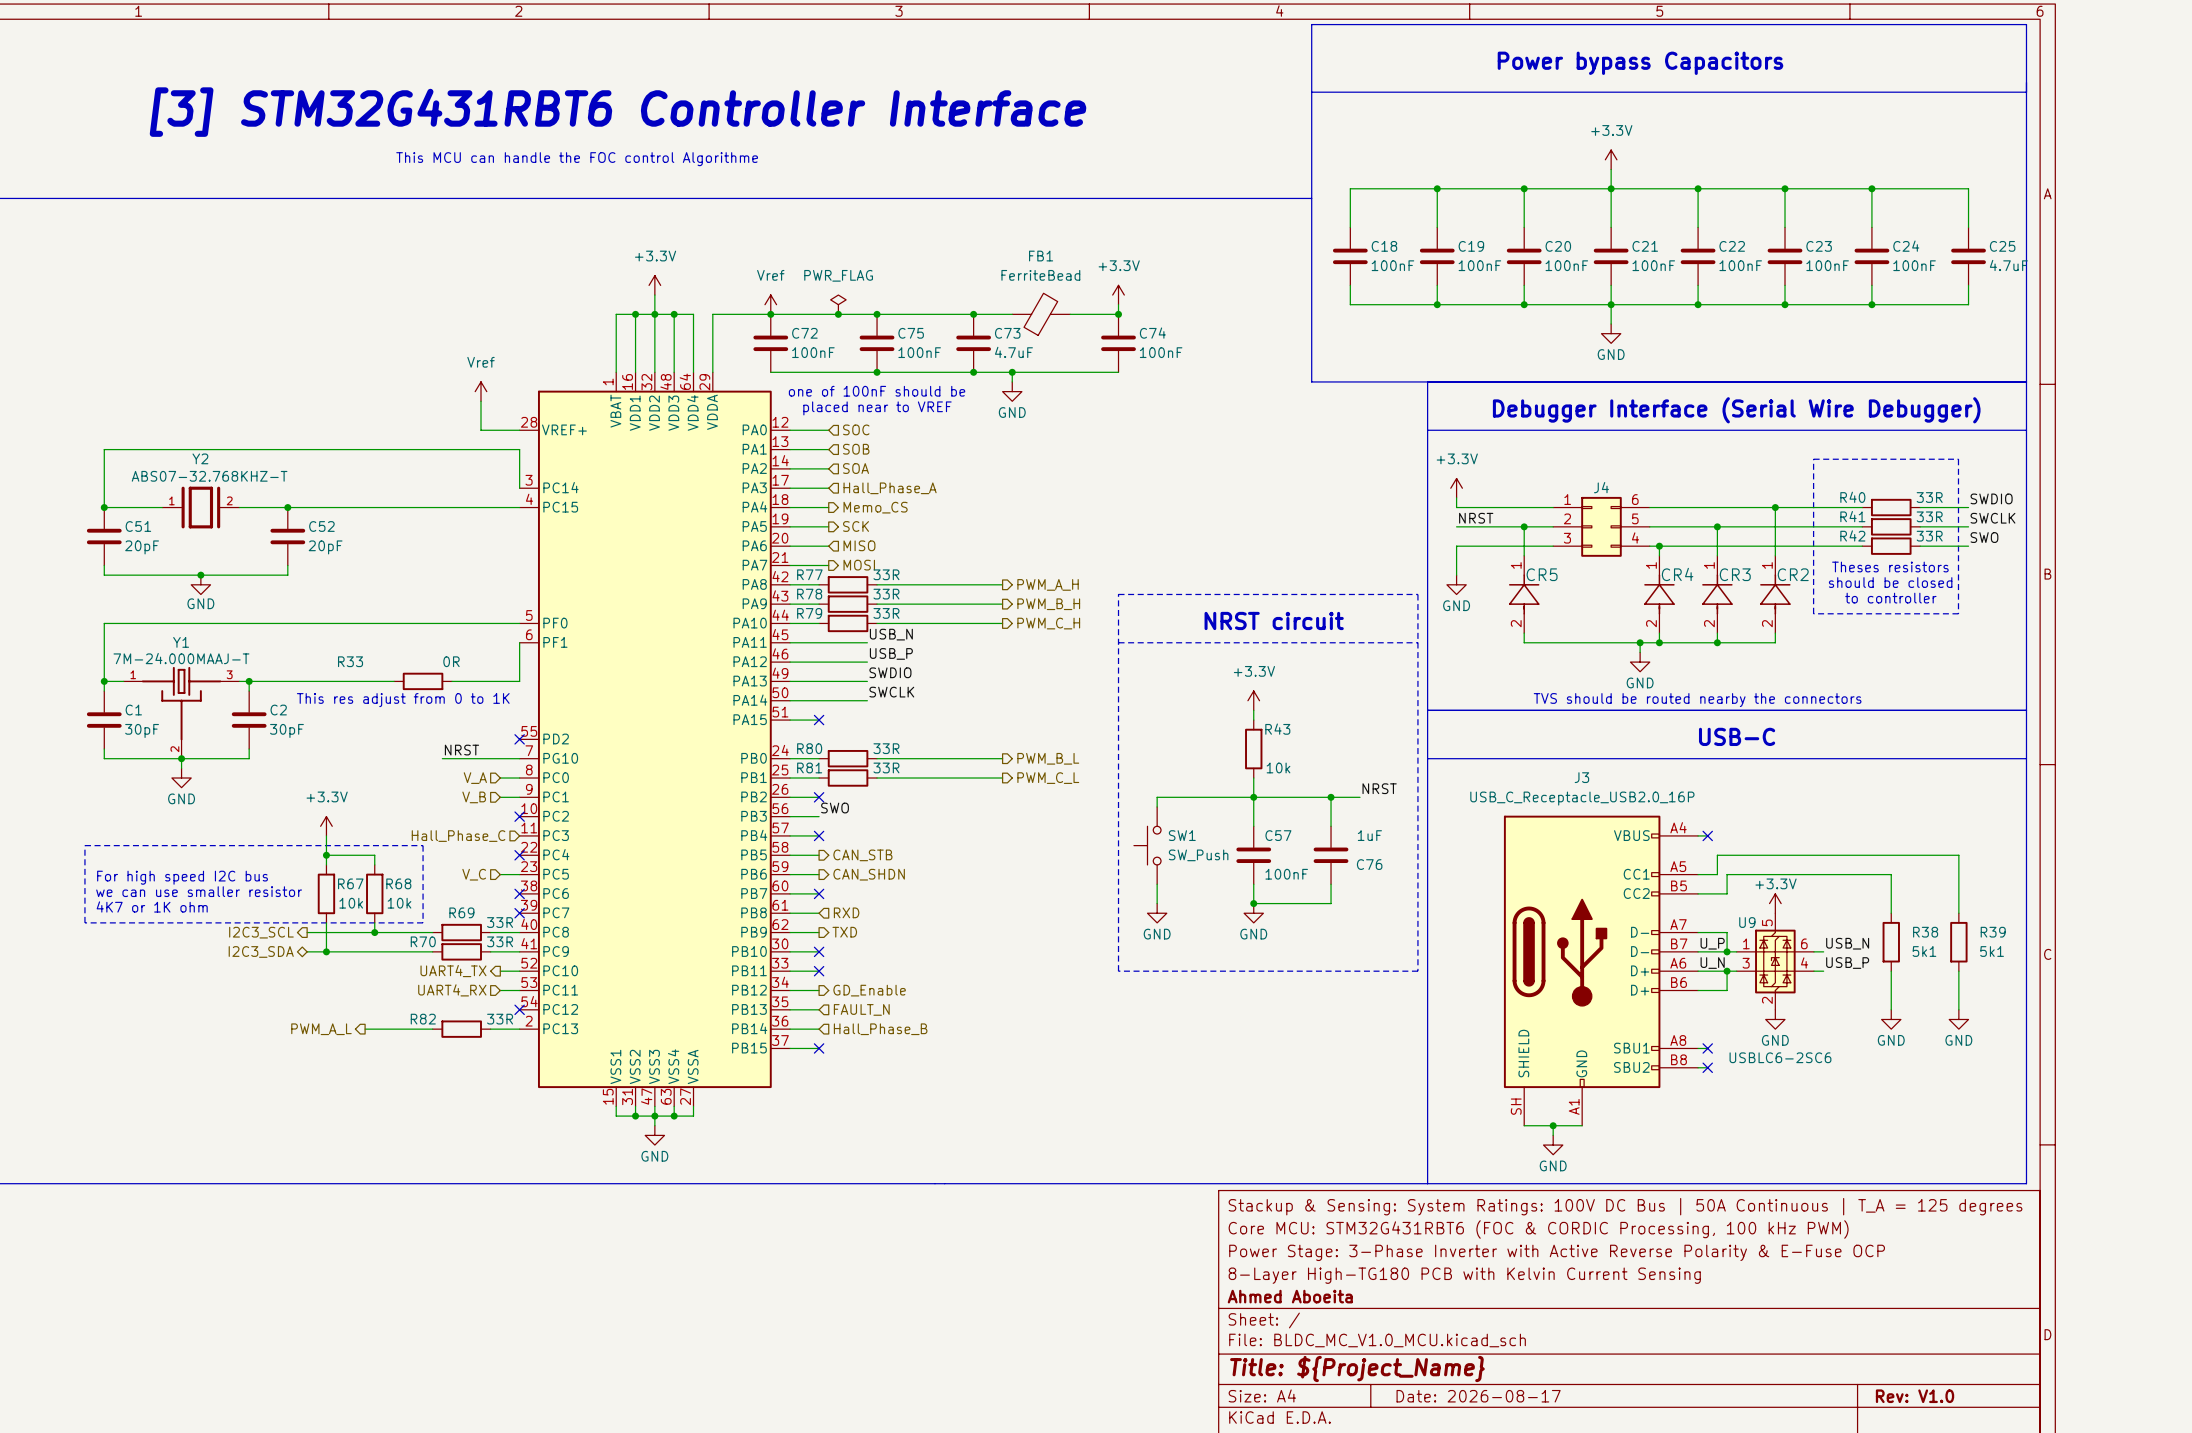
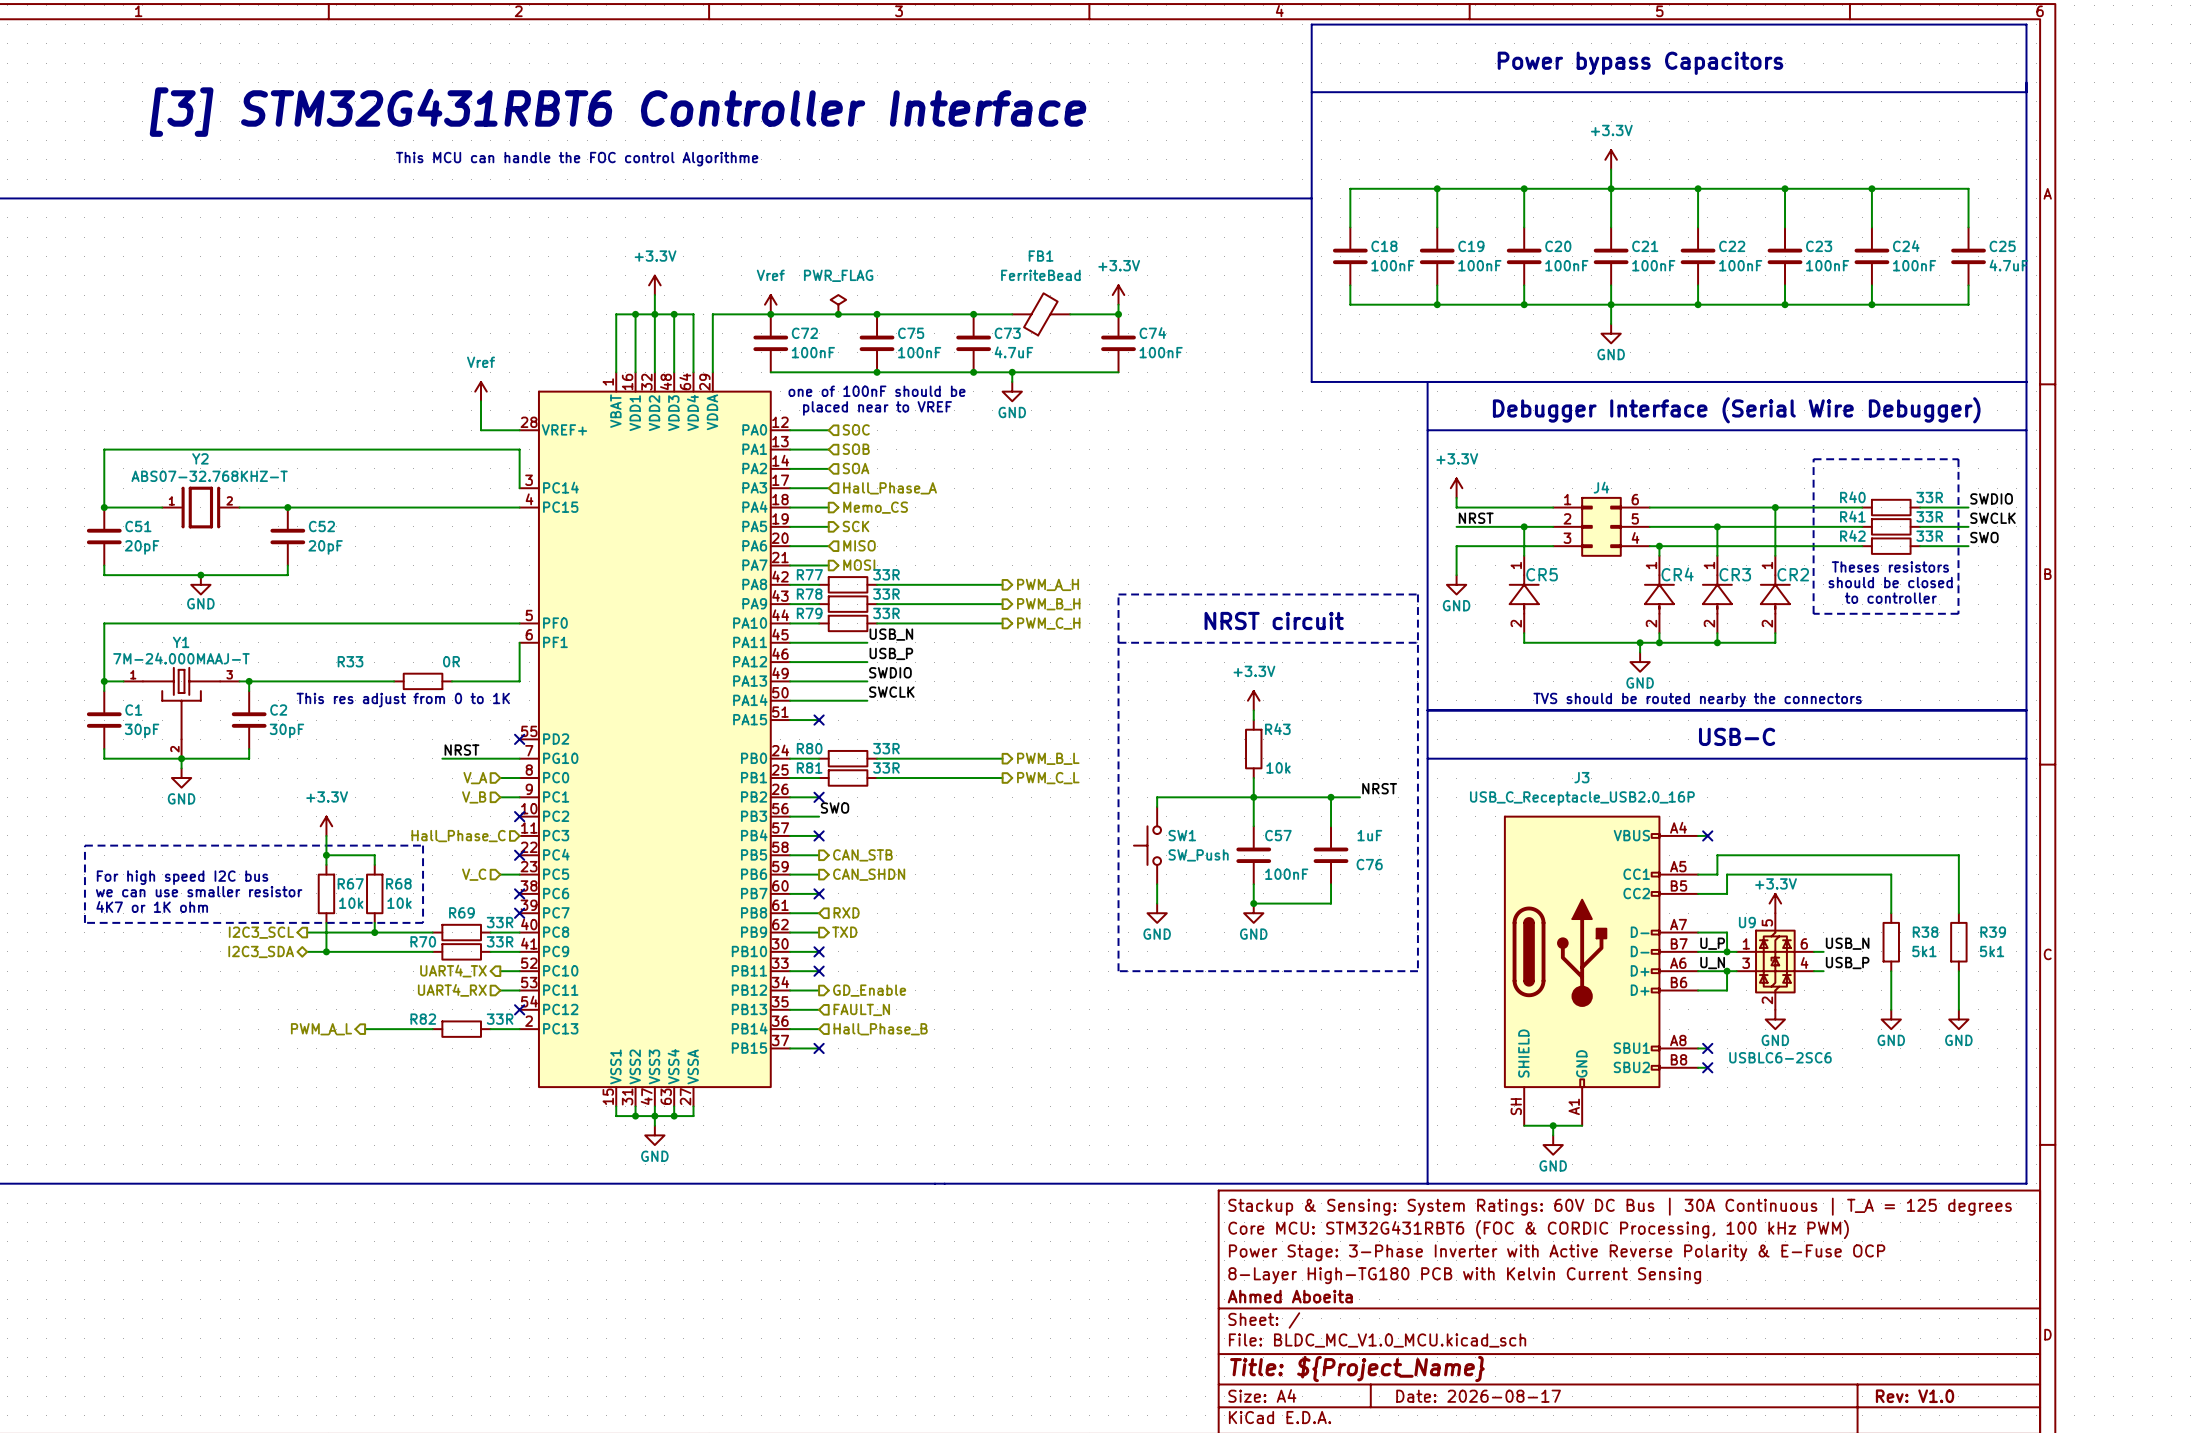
title block: Stackup & Sensing: System Ratings: 100V DC Bus | 50A Continuous | T_A = 125 degrees (1625, 1206) -> Stackup & Sensing: System Ratings: 60V DC Bus | 30A Continuous | T_A = 125 degrees (1620, 1206)

